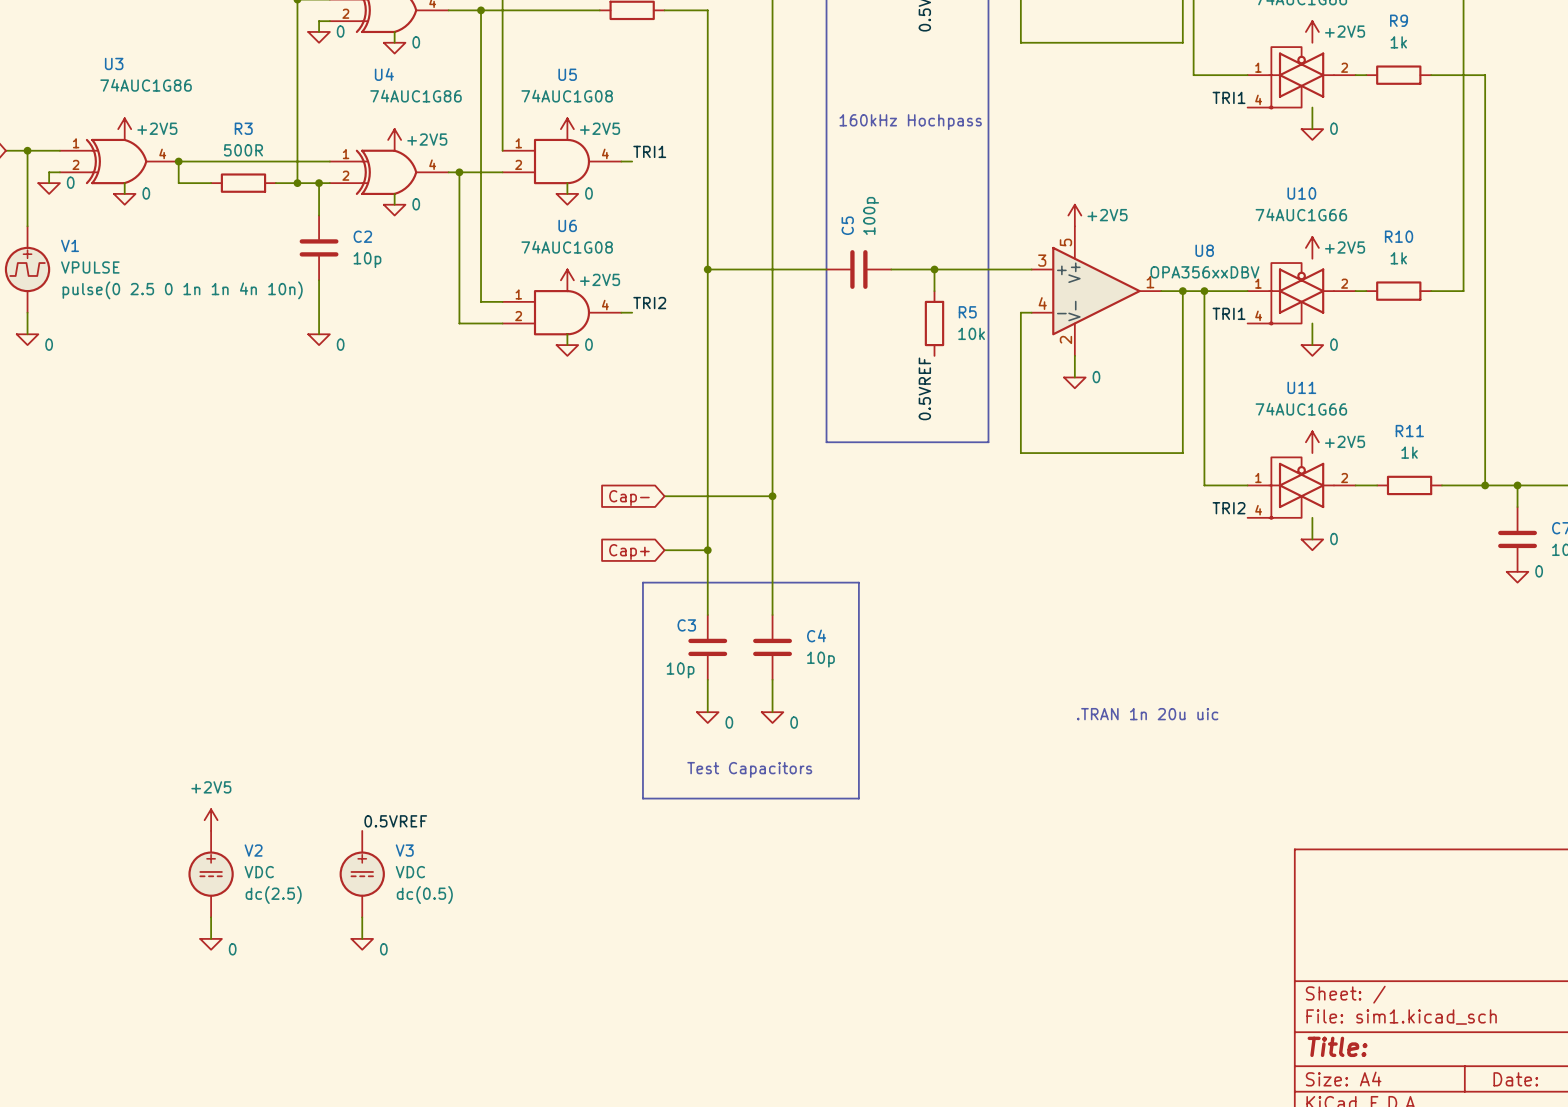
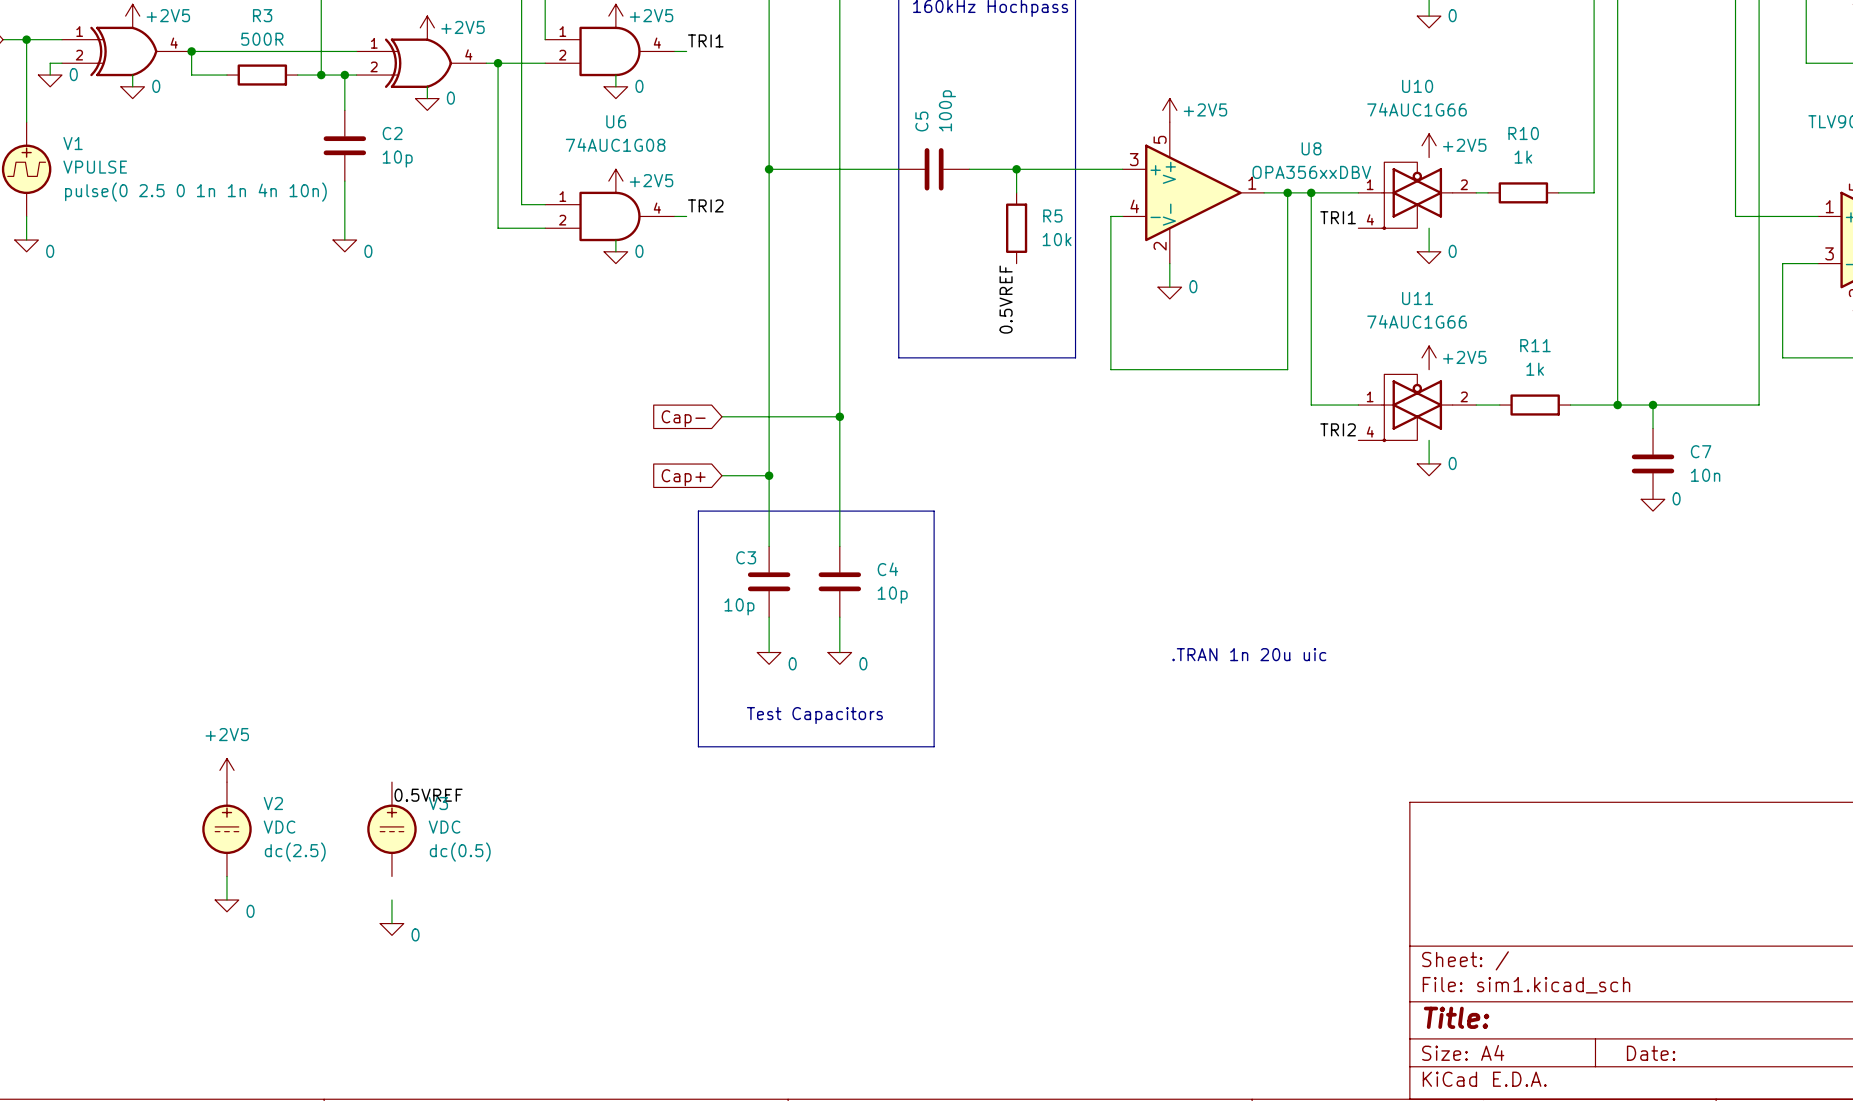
label position: 0.5VREF (395, 821) -> 0.5VREF (428, 795)
wire: (362, 917) (362, 938) -> (391, 923) (391, 900)
power symbol position: 0 (362, 944) -> 0 (391, 929)

